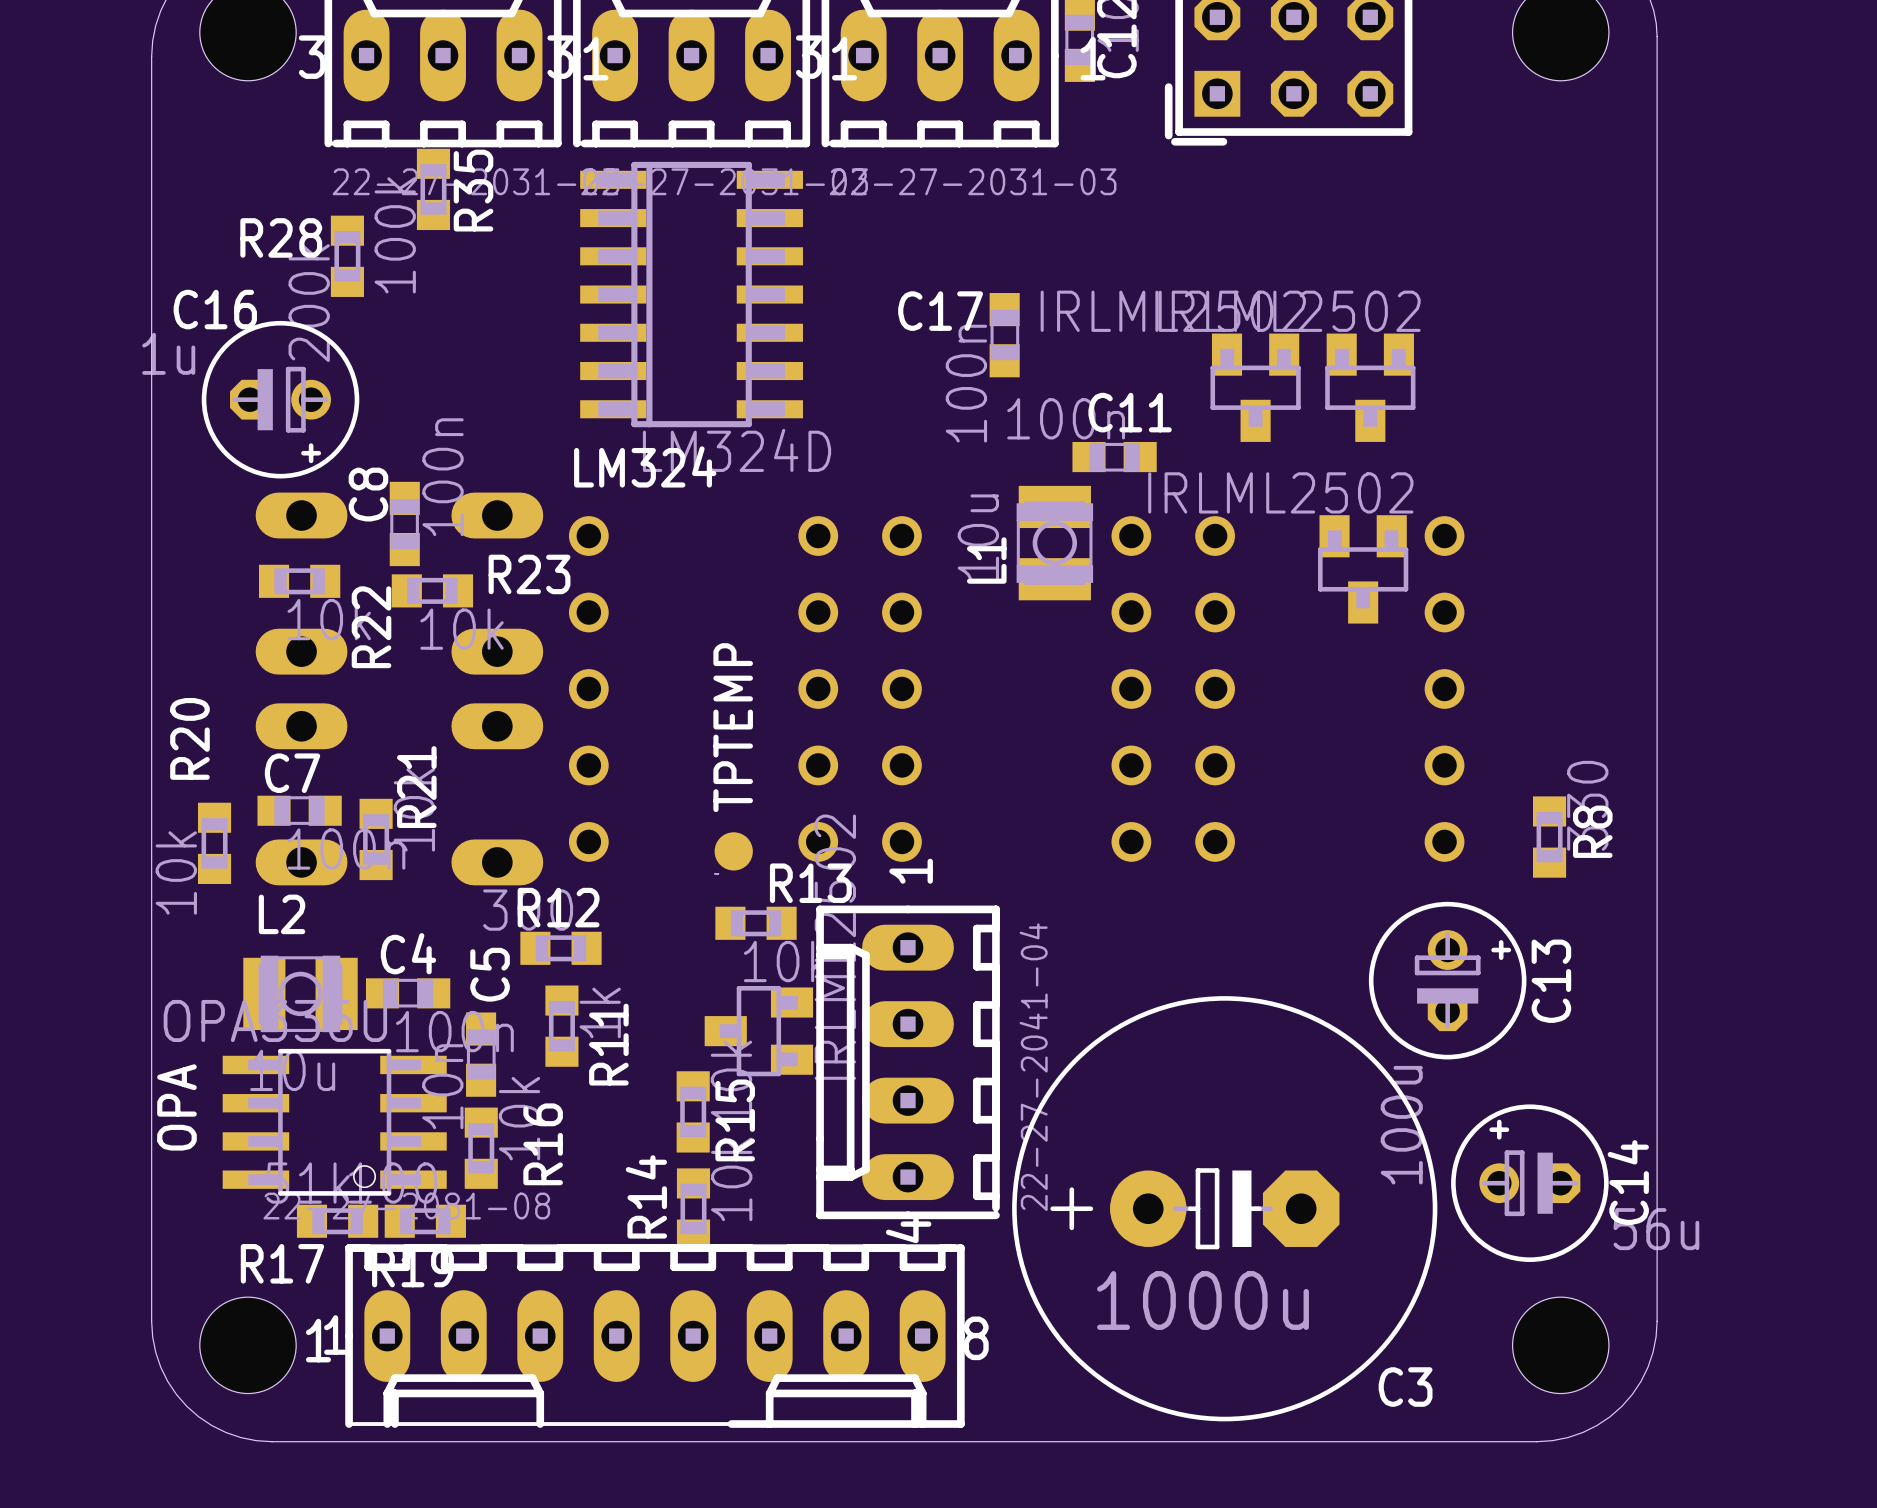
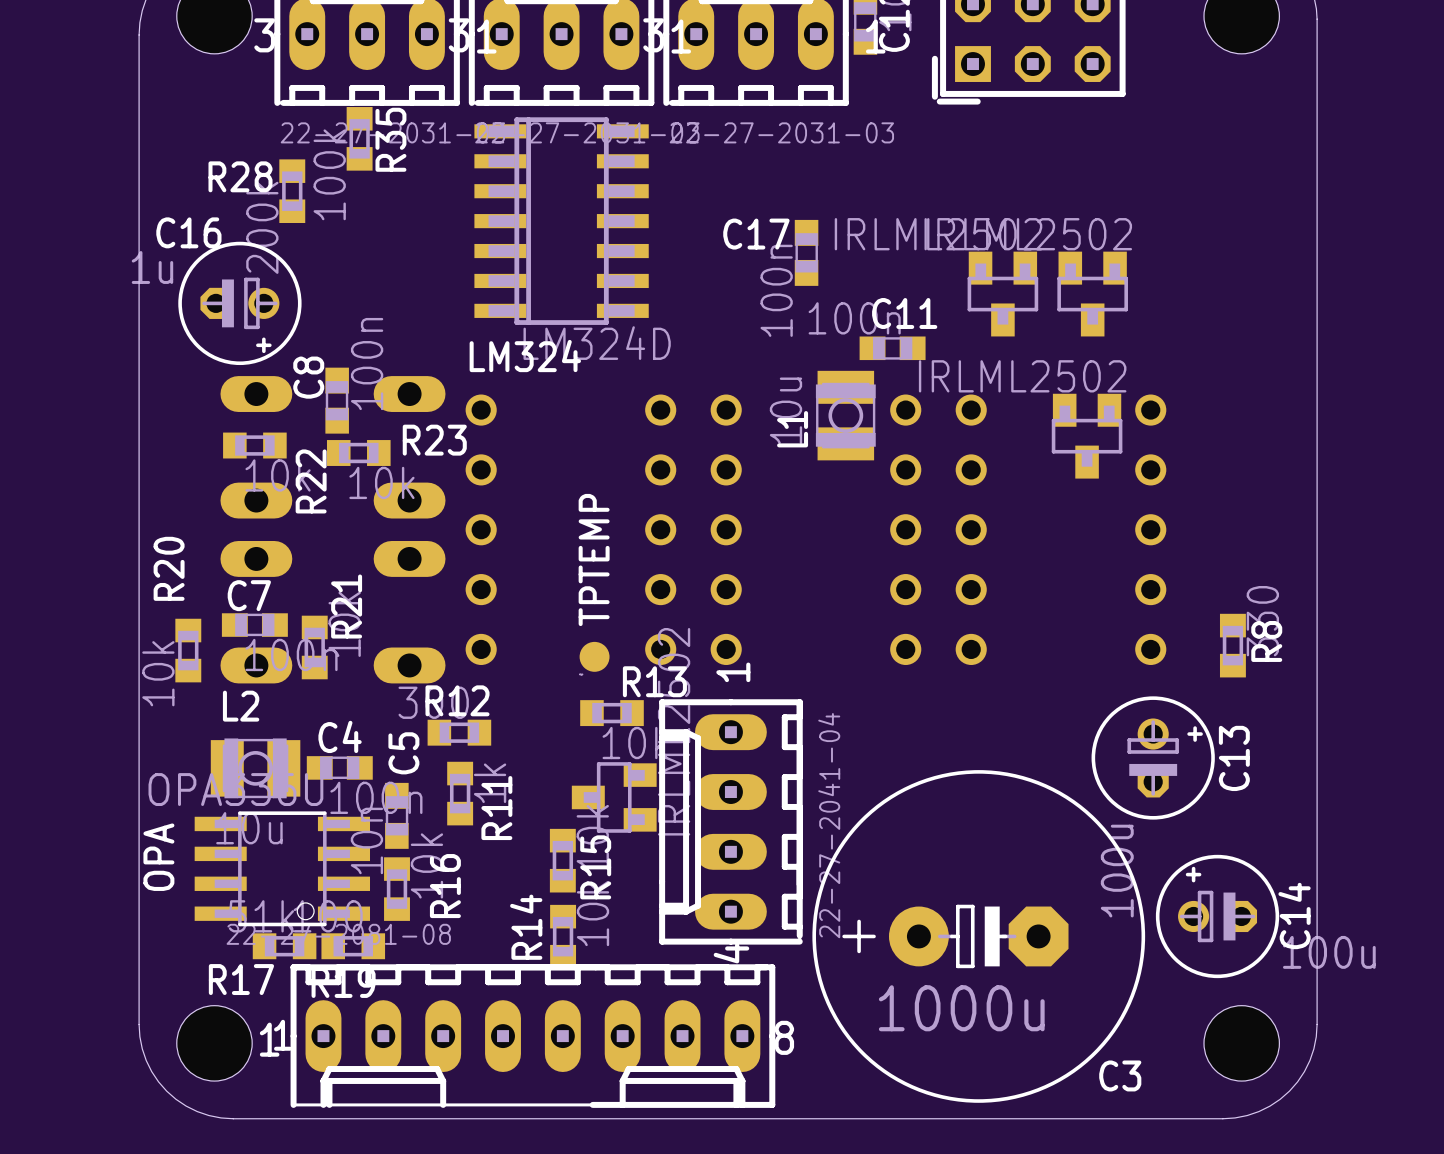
C14 value: 56u (1656, 1229) -> 100u (1329, 952)

